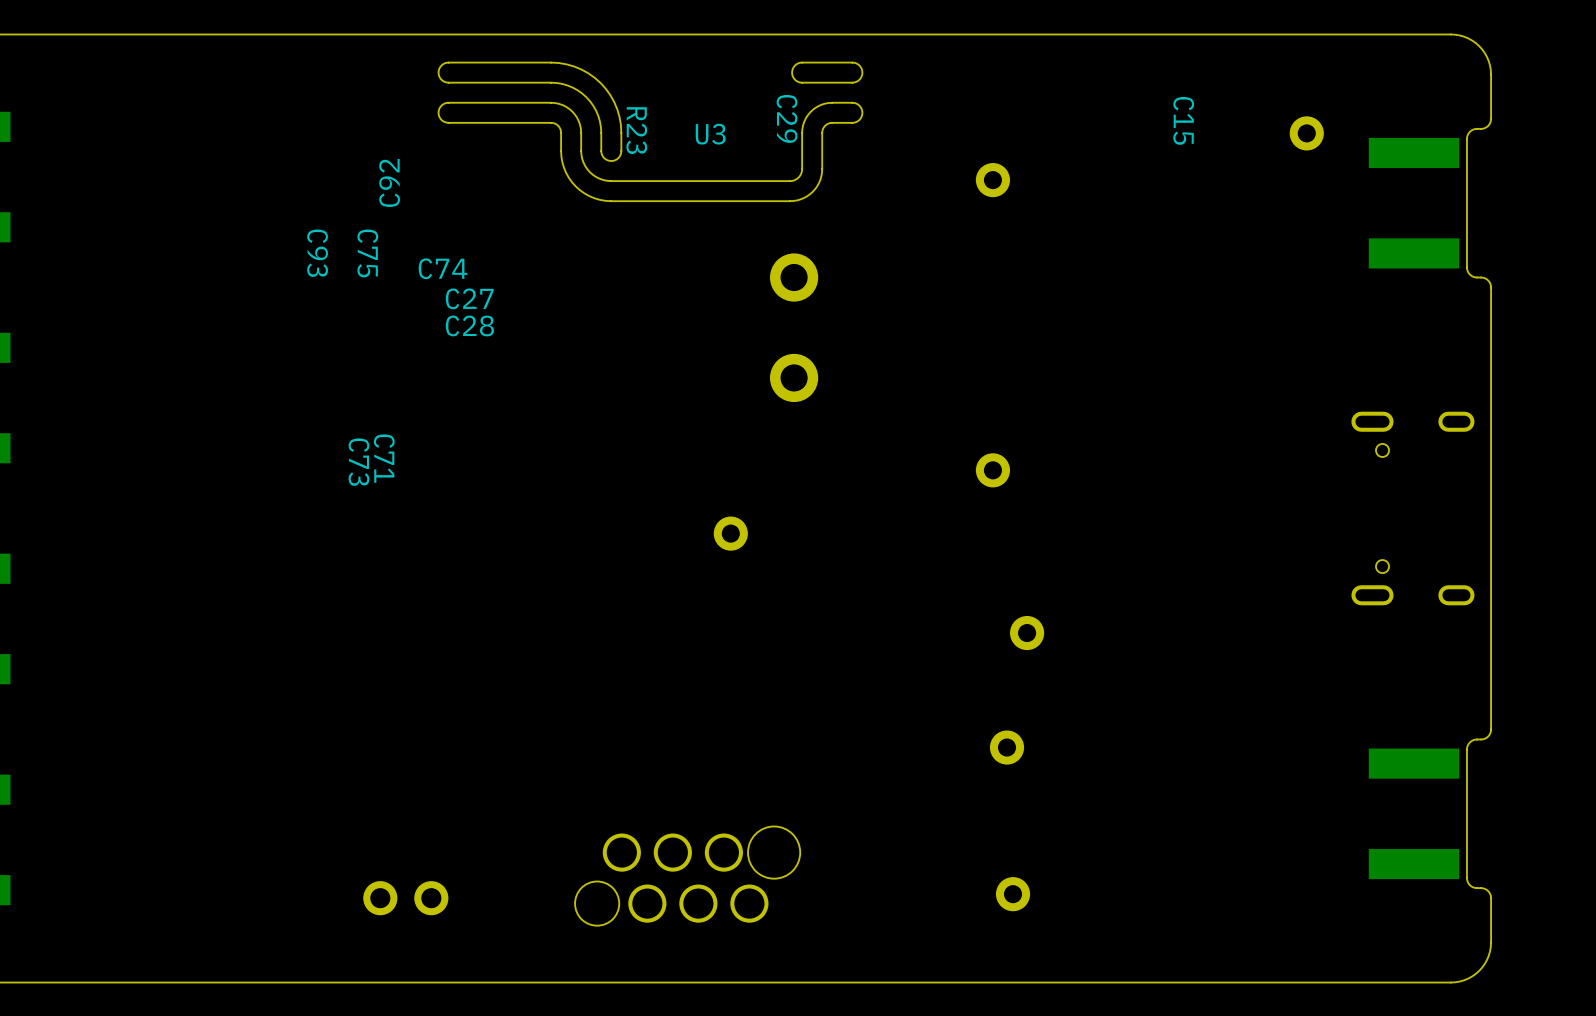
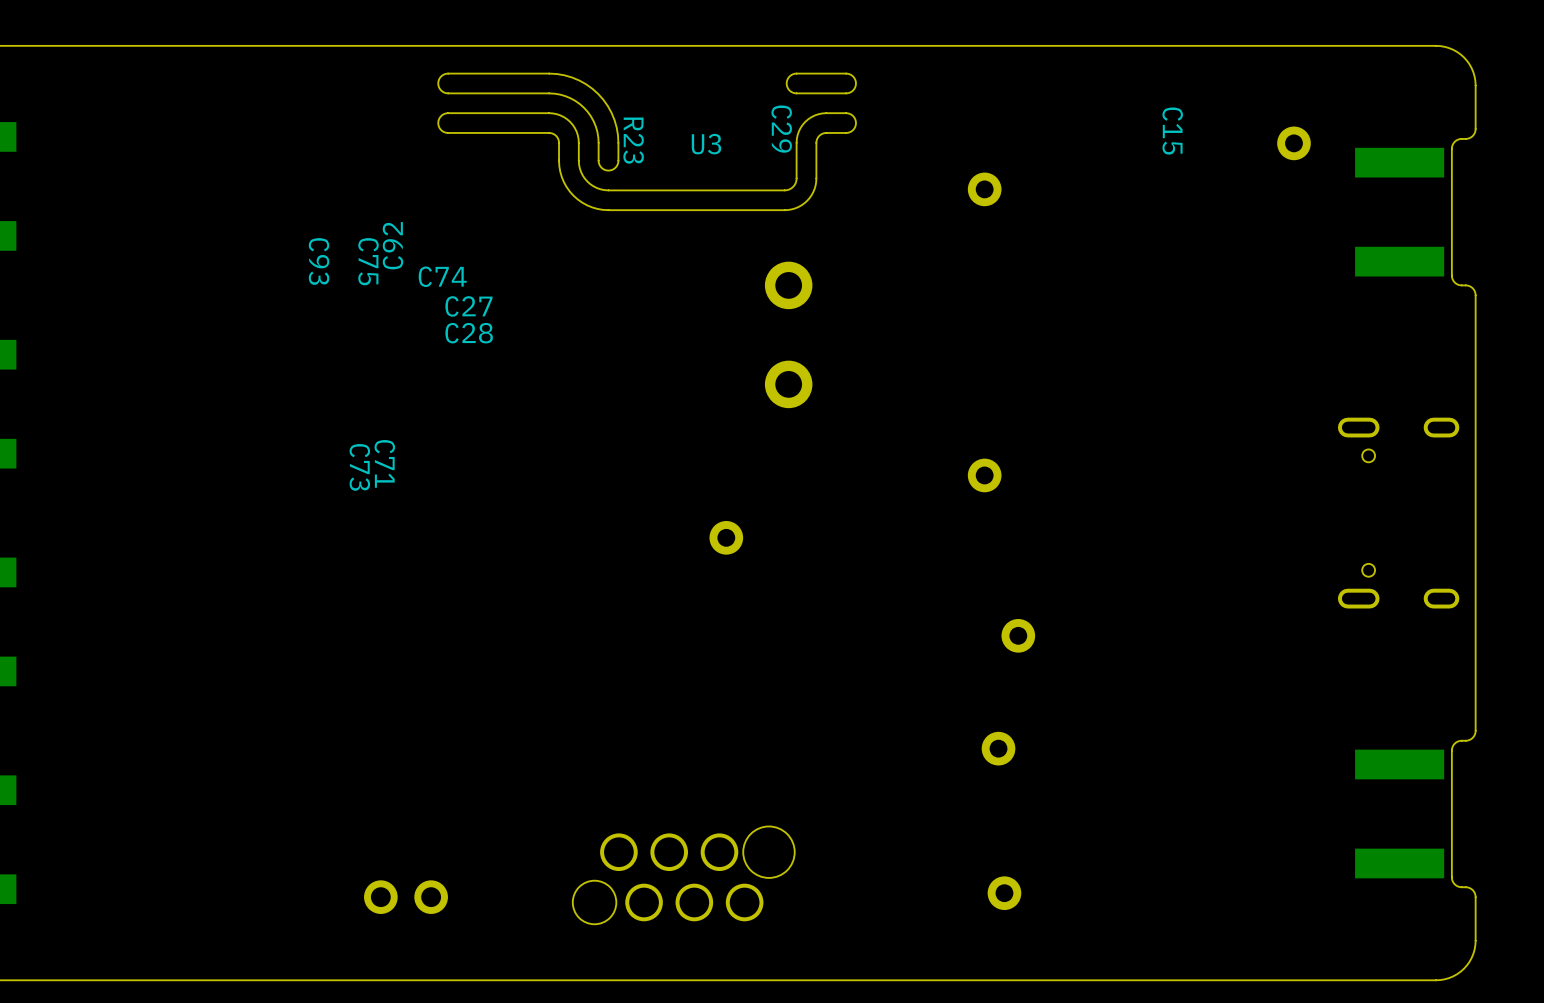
C92 position: (389, 183) -> (392, 245)

